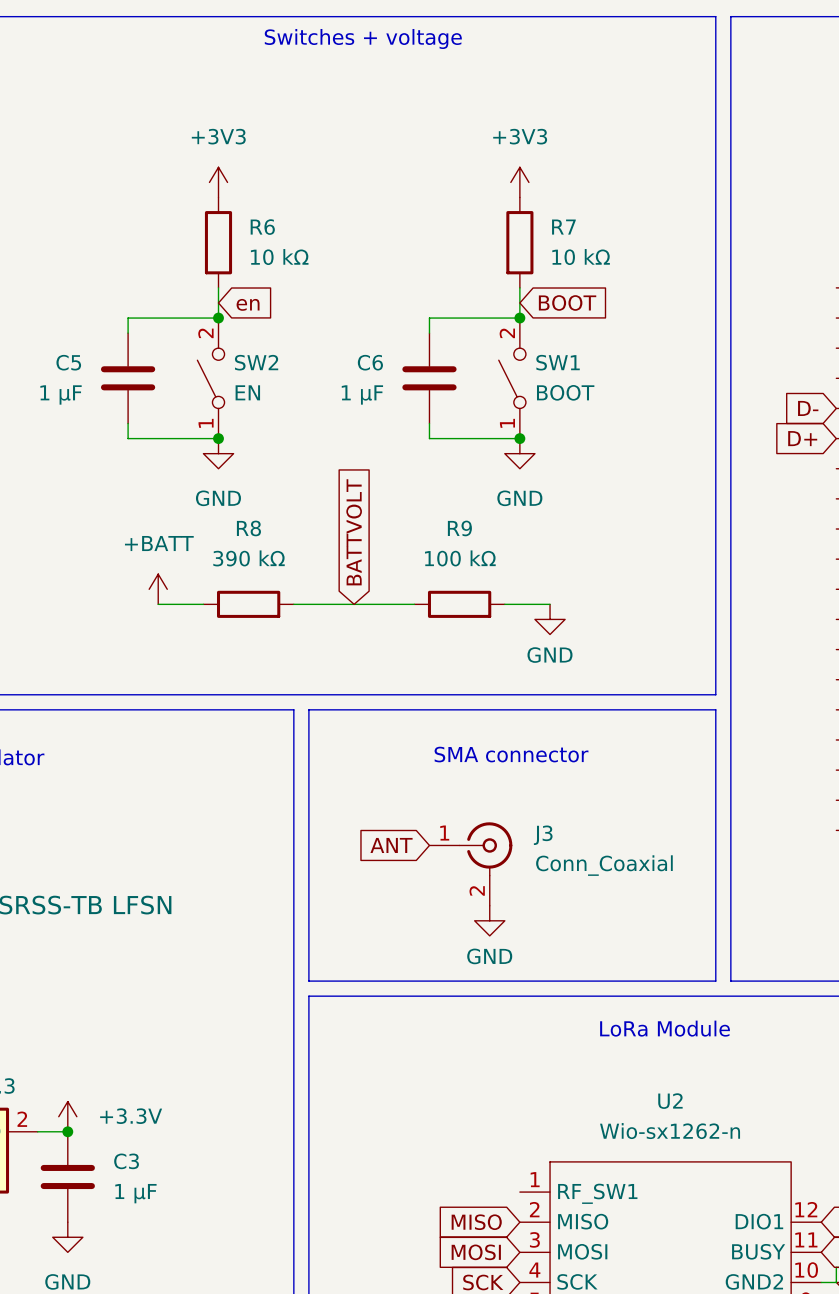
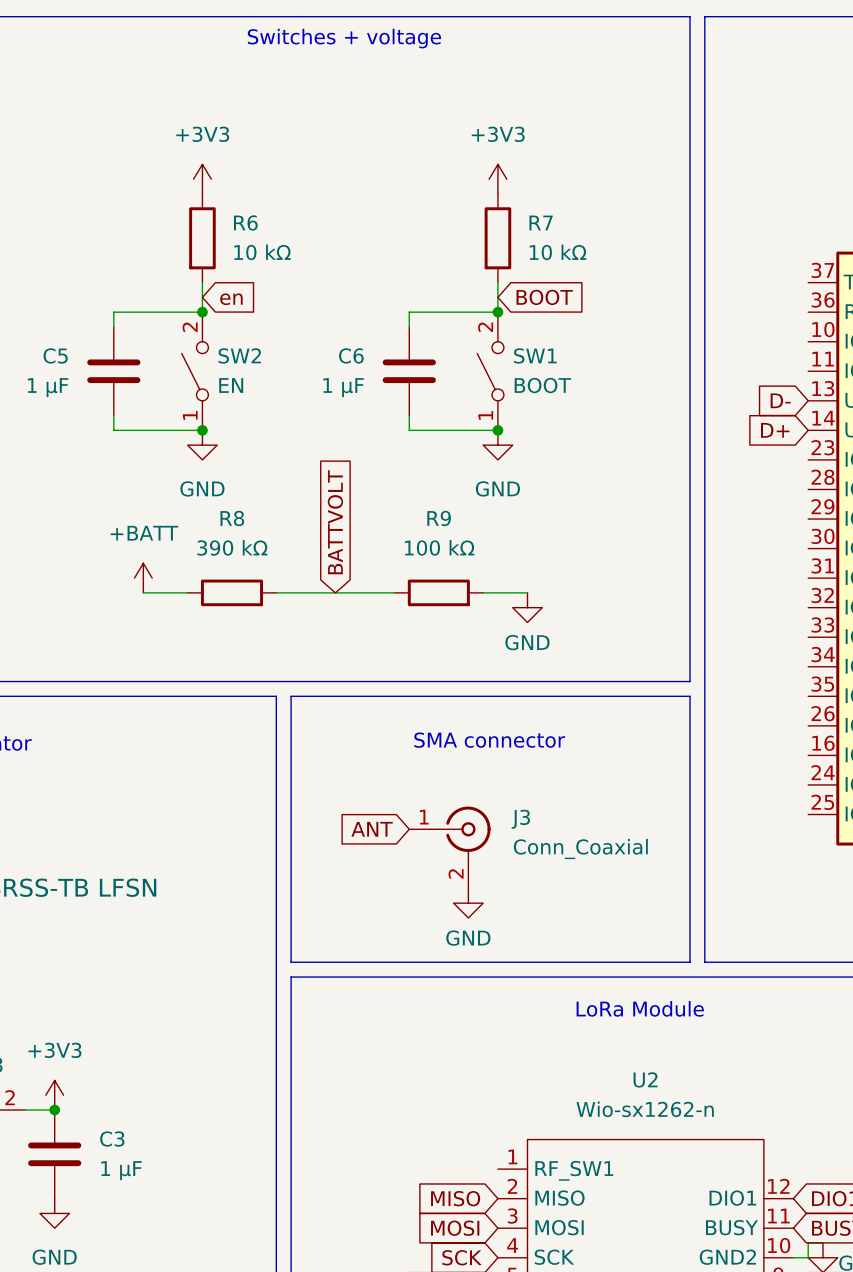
power symbol: +3.3V (67, 1116) -> +3V3 (54, 1095)

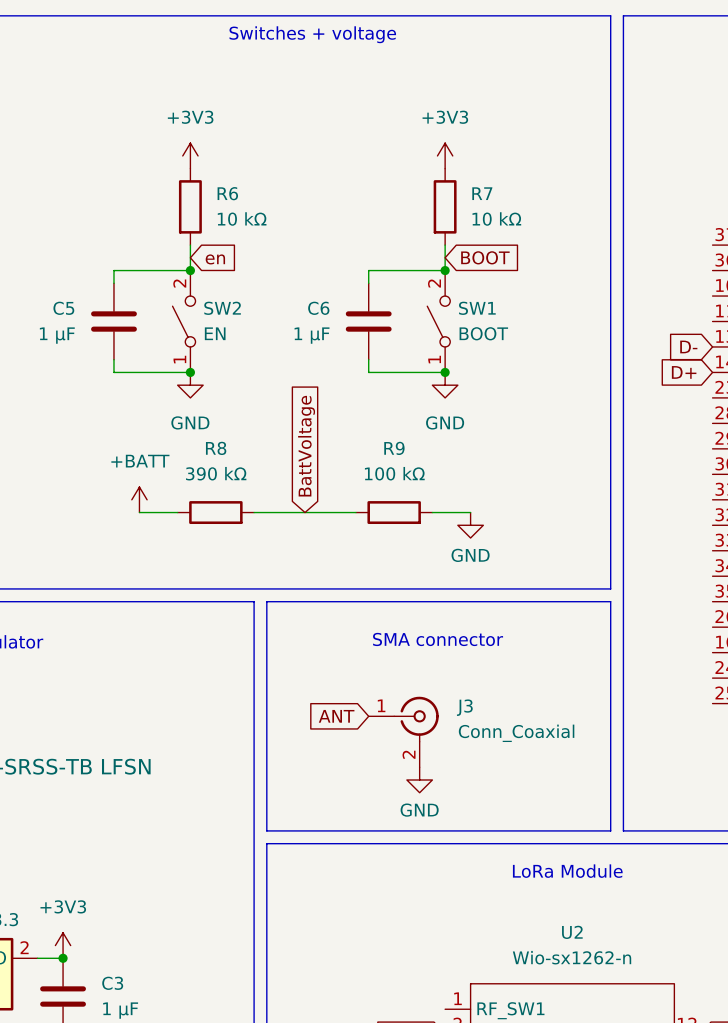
global label: BATTVOLT (335, 522) -> BattVoltage (306, 446)

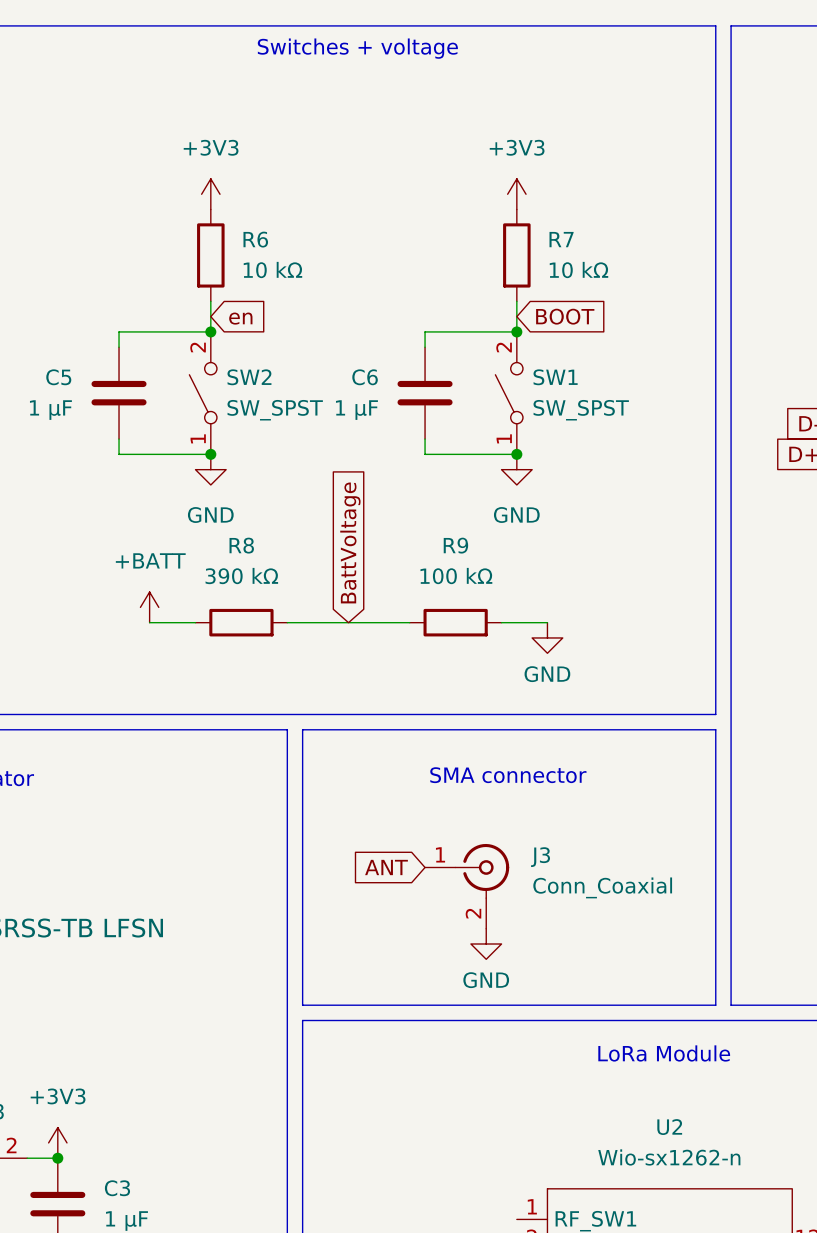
SW2 value: EN (215, 333) -> SW_SPST (275, 410)
SW1 value: BOOT (483, 333) -> SW_SPST (581, 410)

